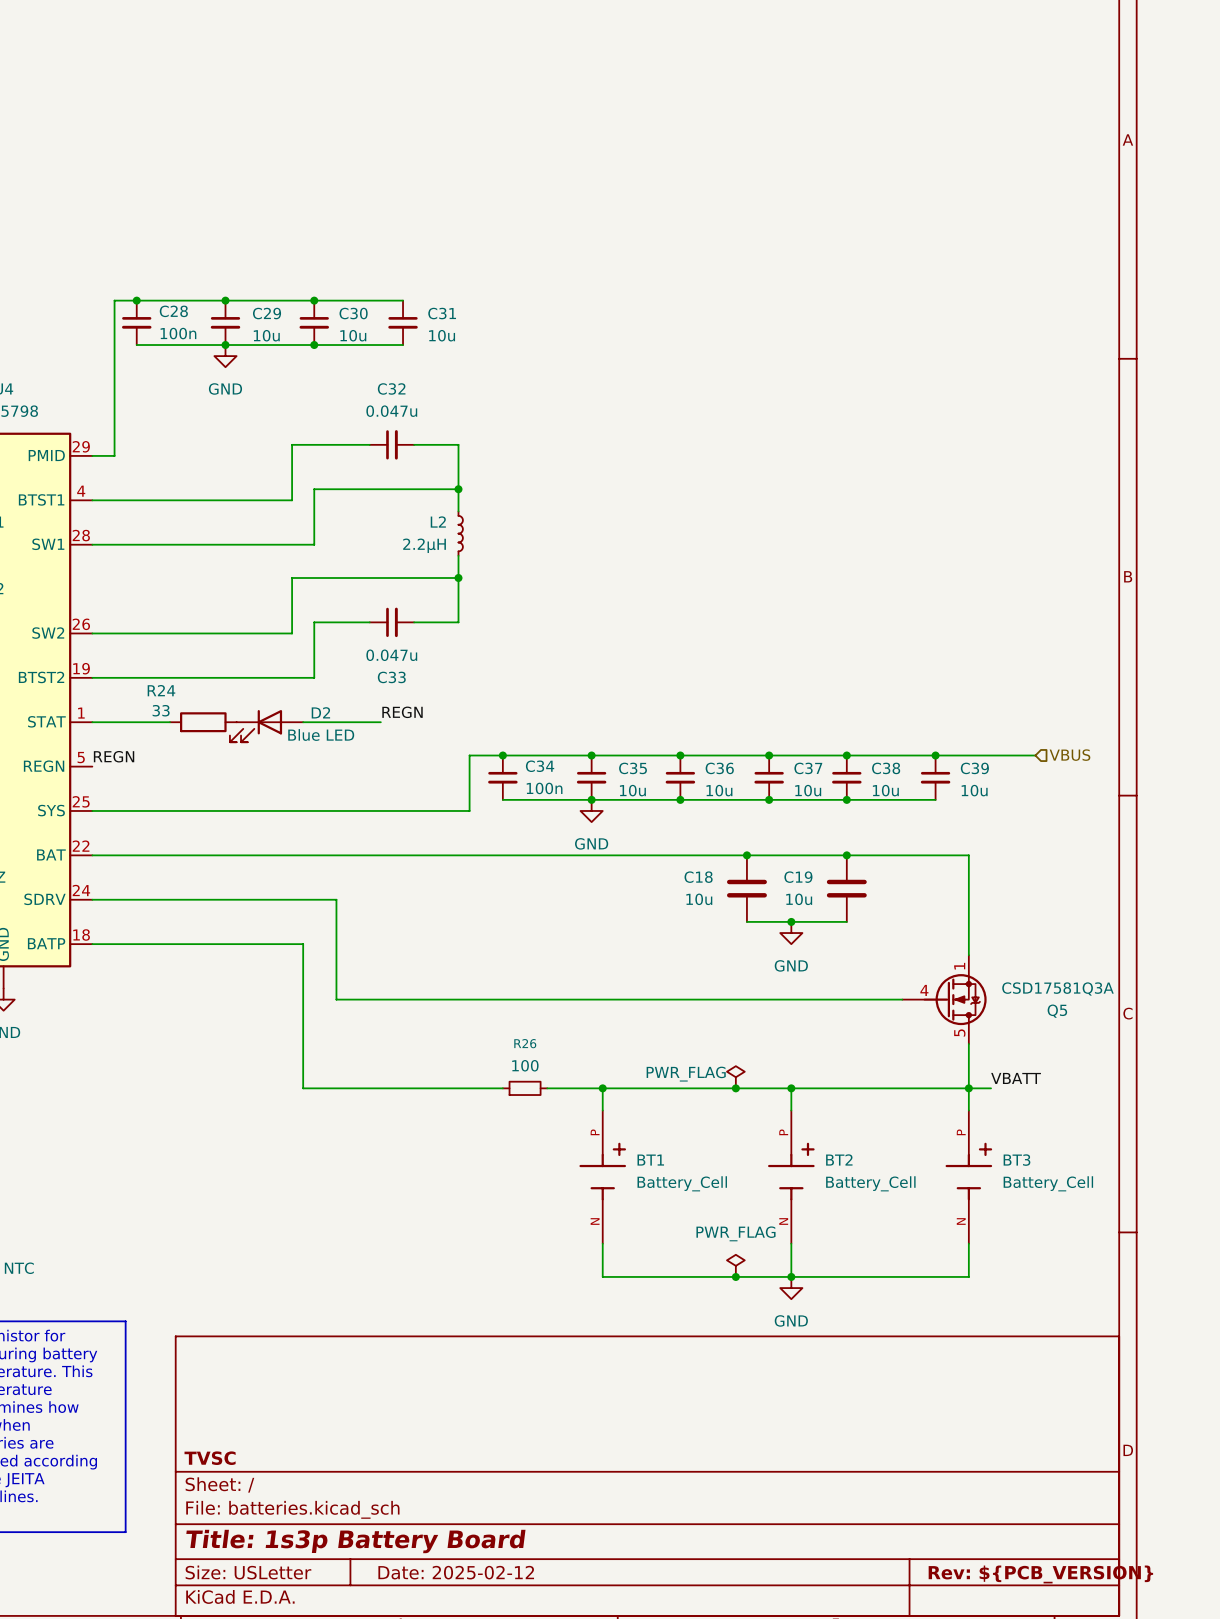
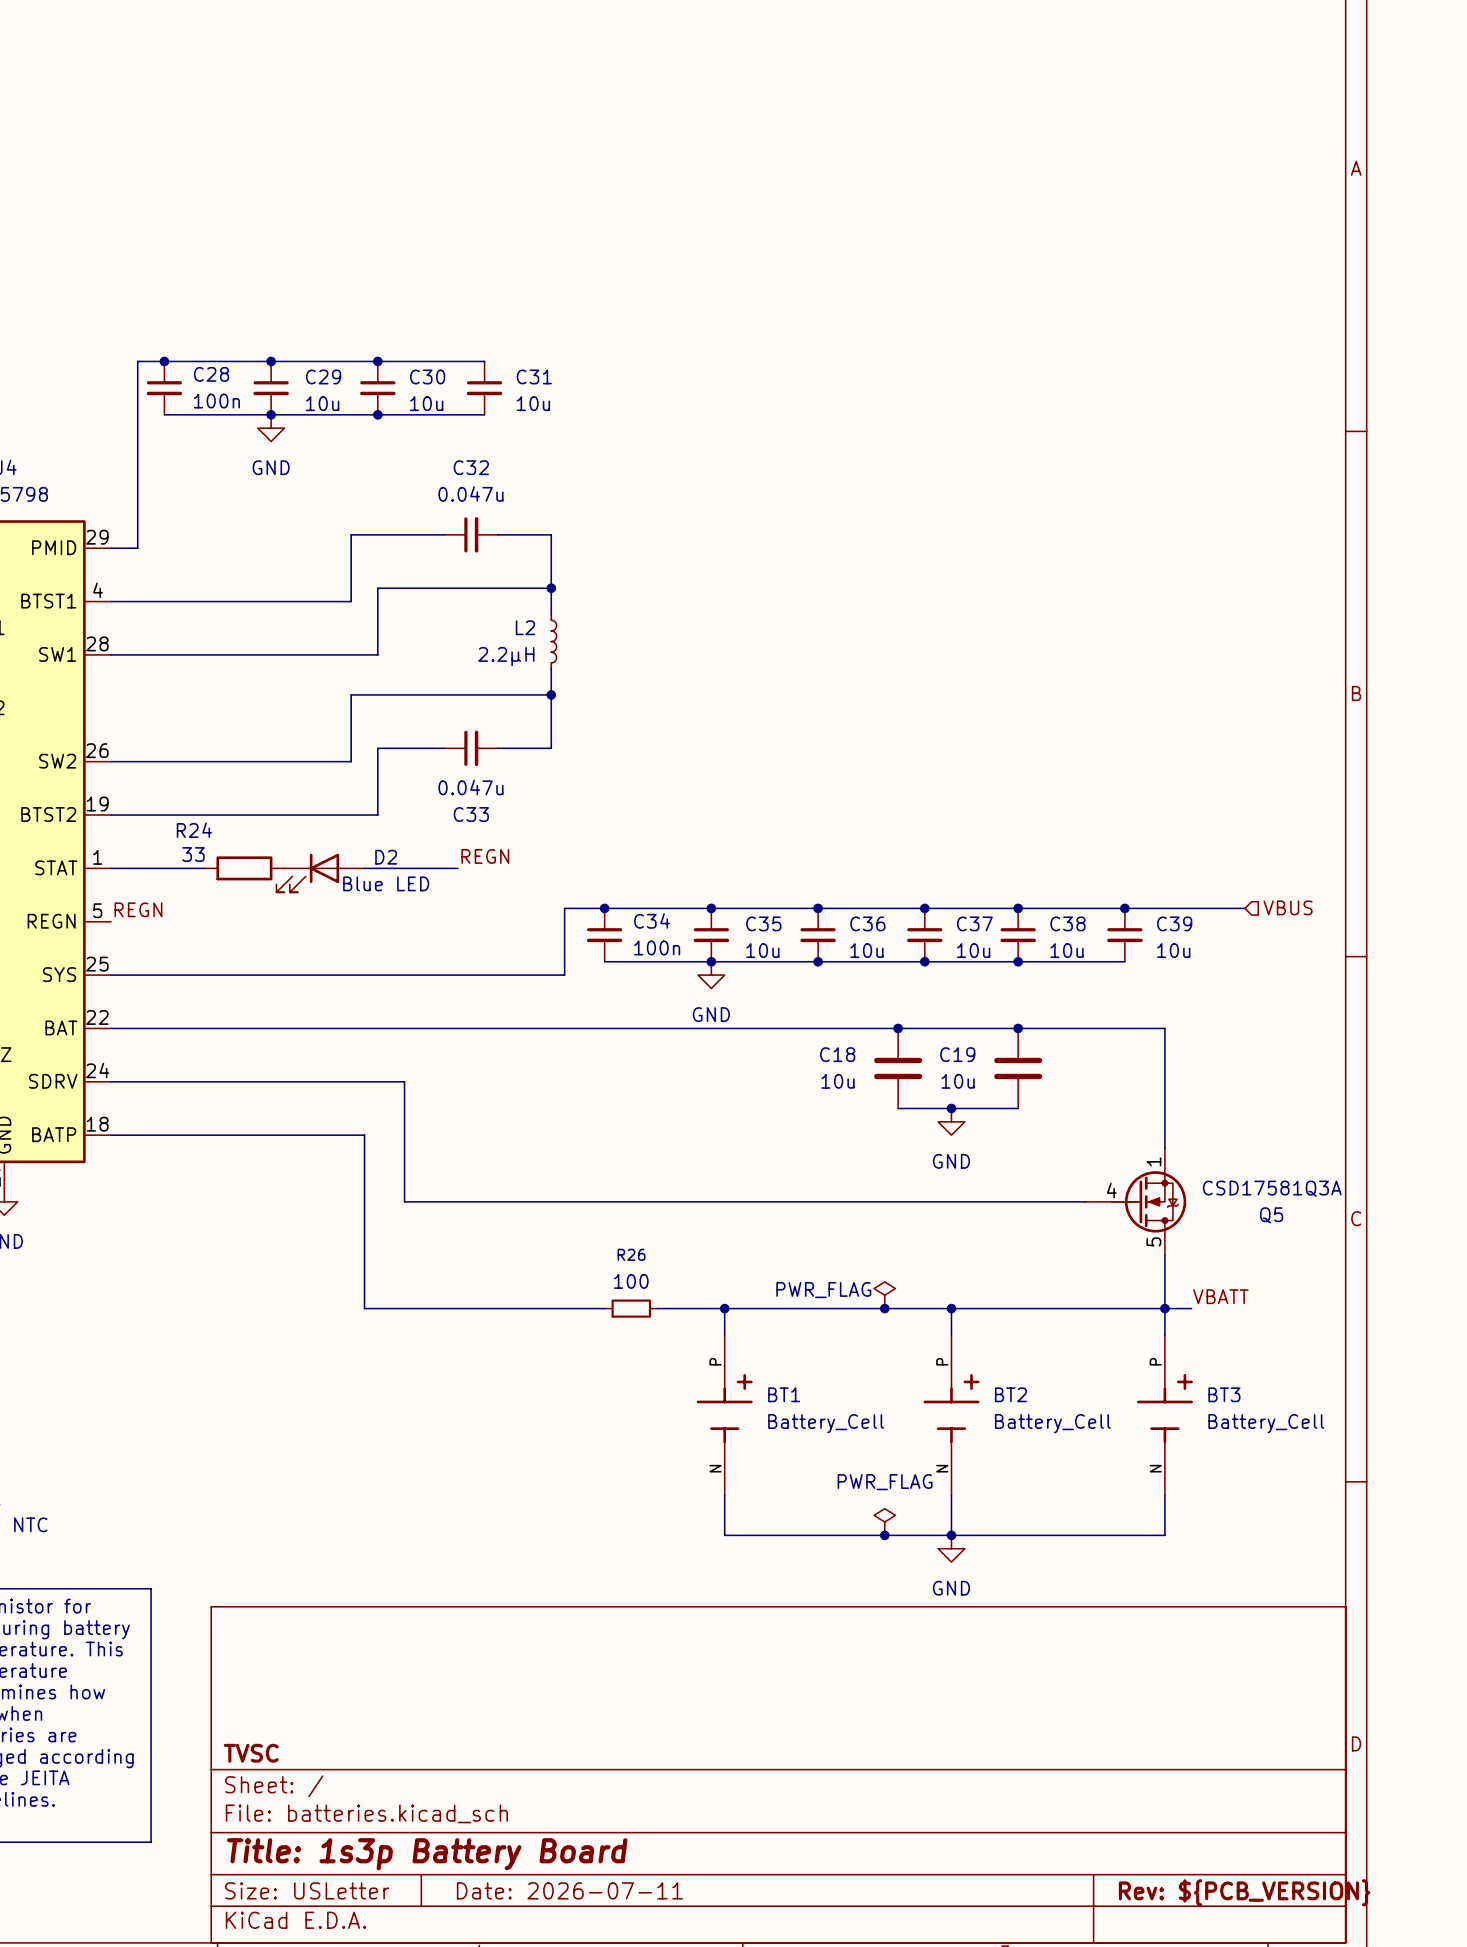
title block: Date: 2025-02-12 (456, 1572) -> Date: 2026-07-11 (569, 1890)

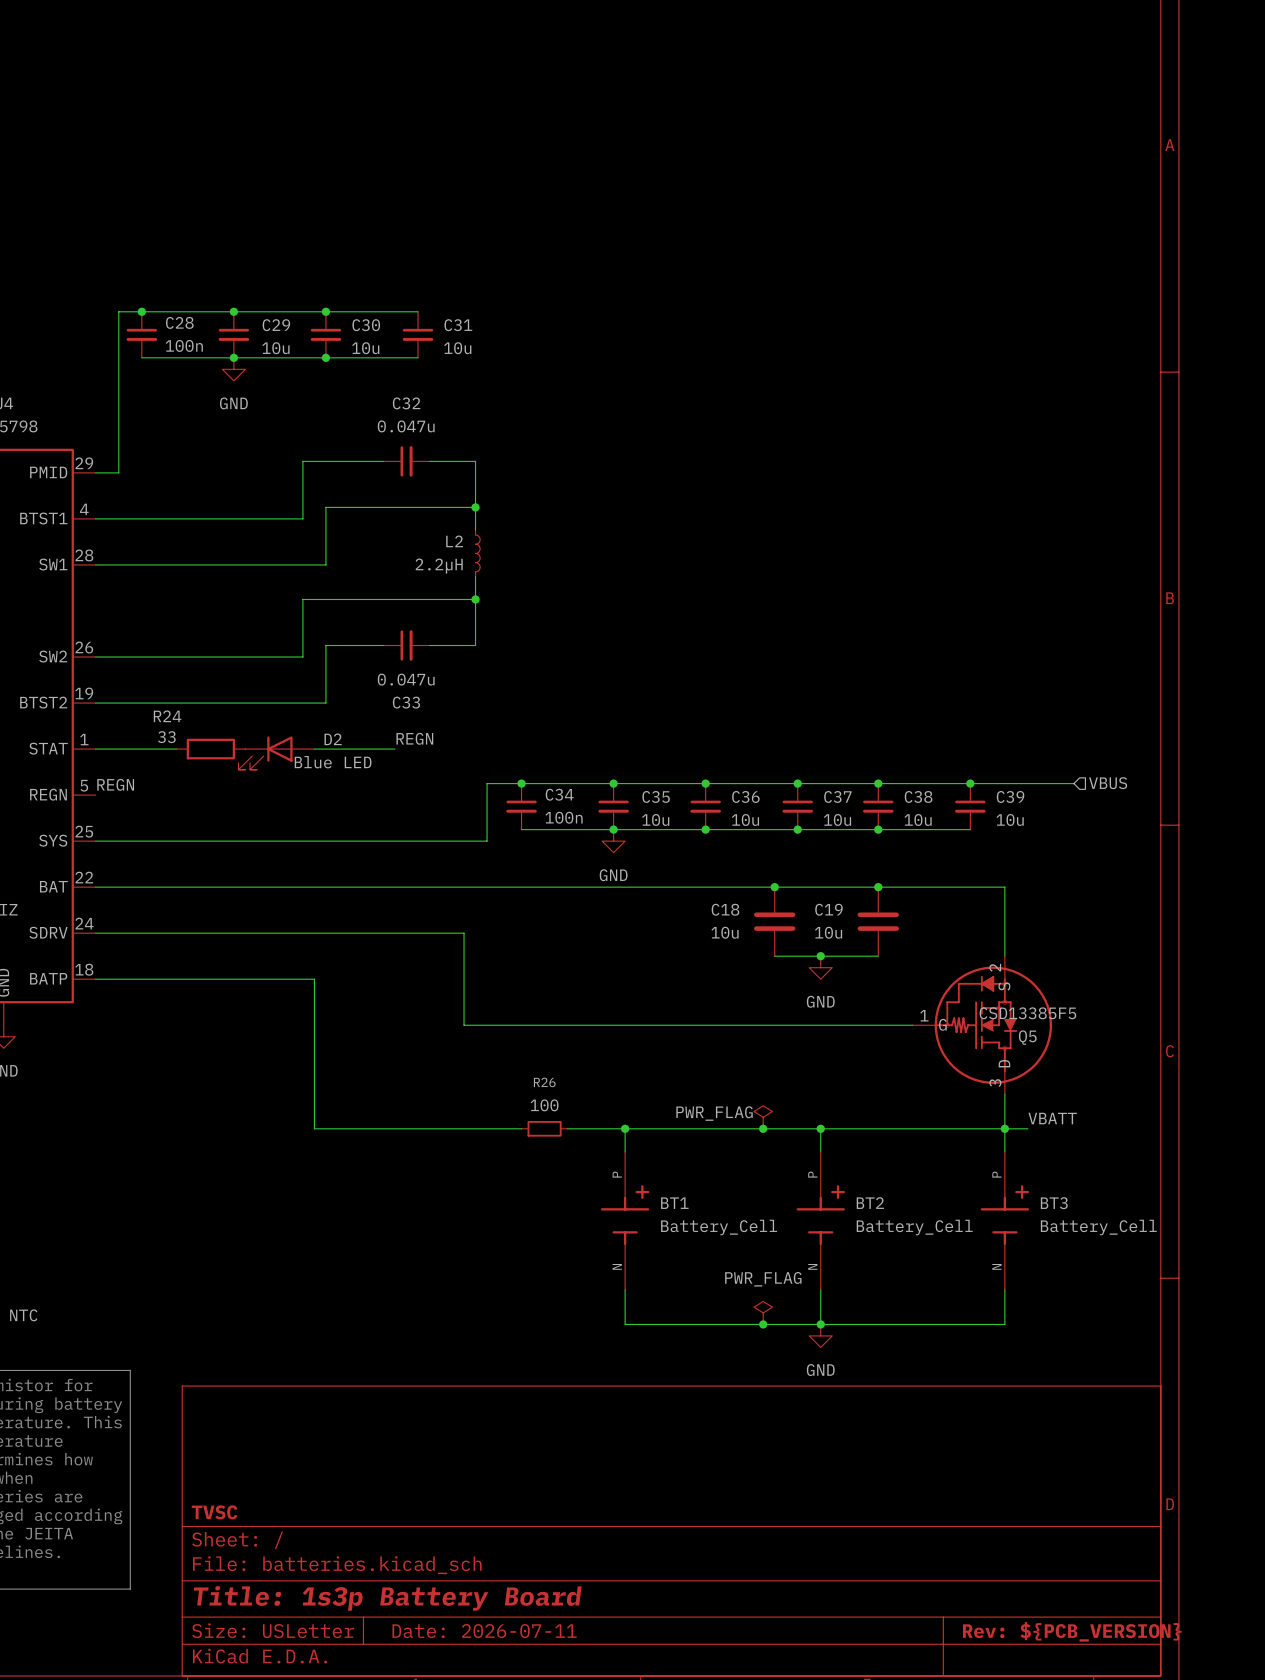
wire: (404, 1081) (404, 1201) (1084, 1201) -> (348, 933) (464, 933) (464, 1025) (912, 1025)
Q5 symbol: [1084, 1148, 1187, 1256] -> [912, 956, 1053, 1095]
Q5 value: CSD17581Q3A (1272, 1188) -> CSD13385F5 (1027, 1013)
Q5 name position: Q5 (1271, 1215) -> Q5 (1027, 1037)

